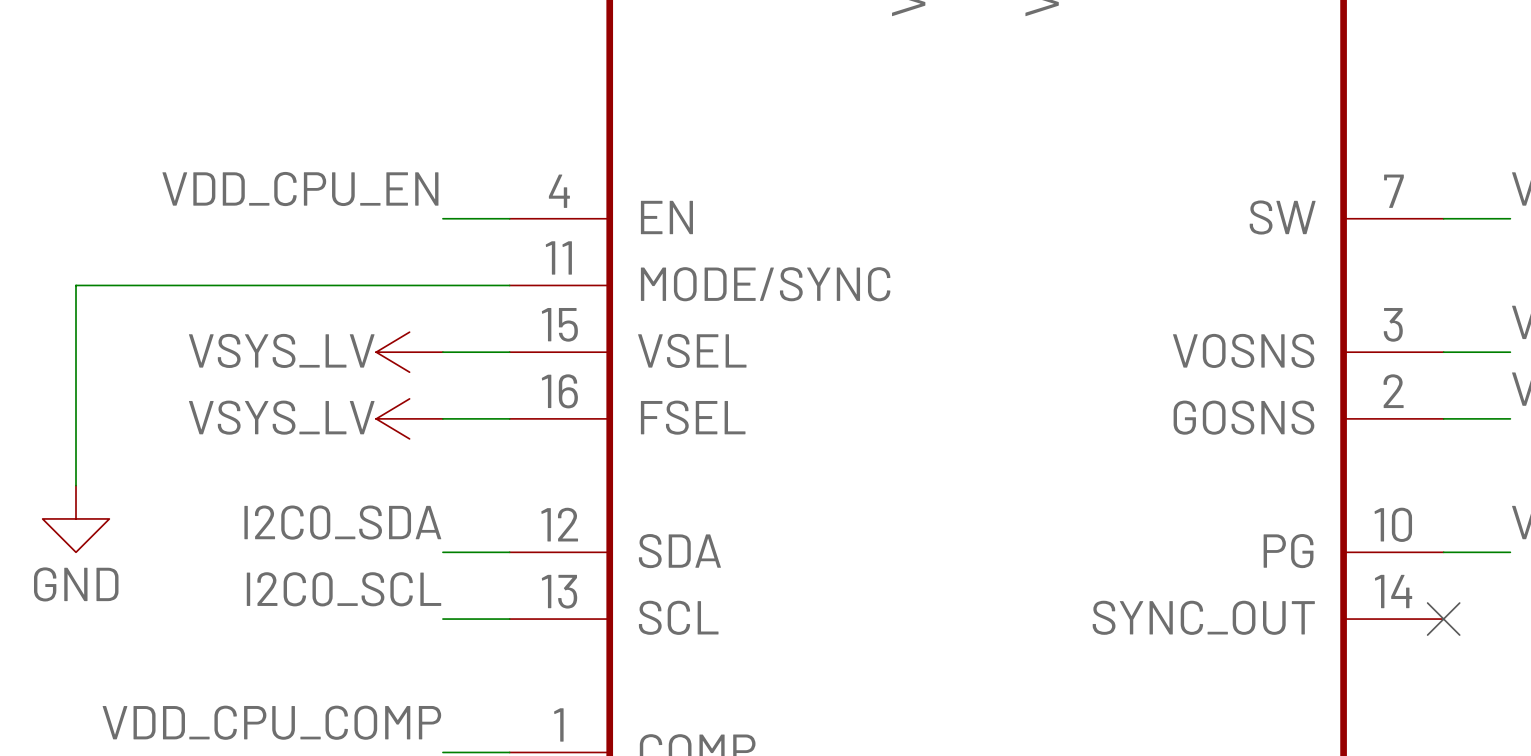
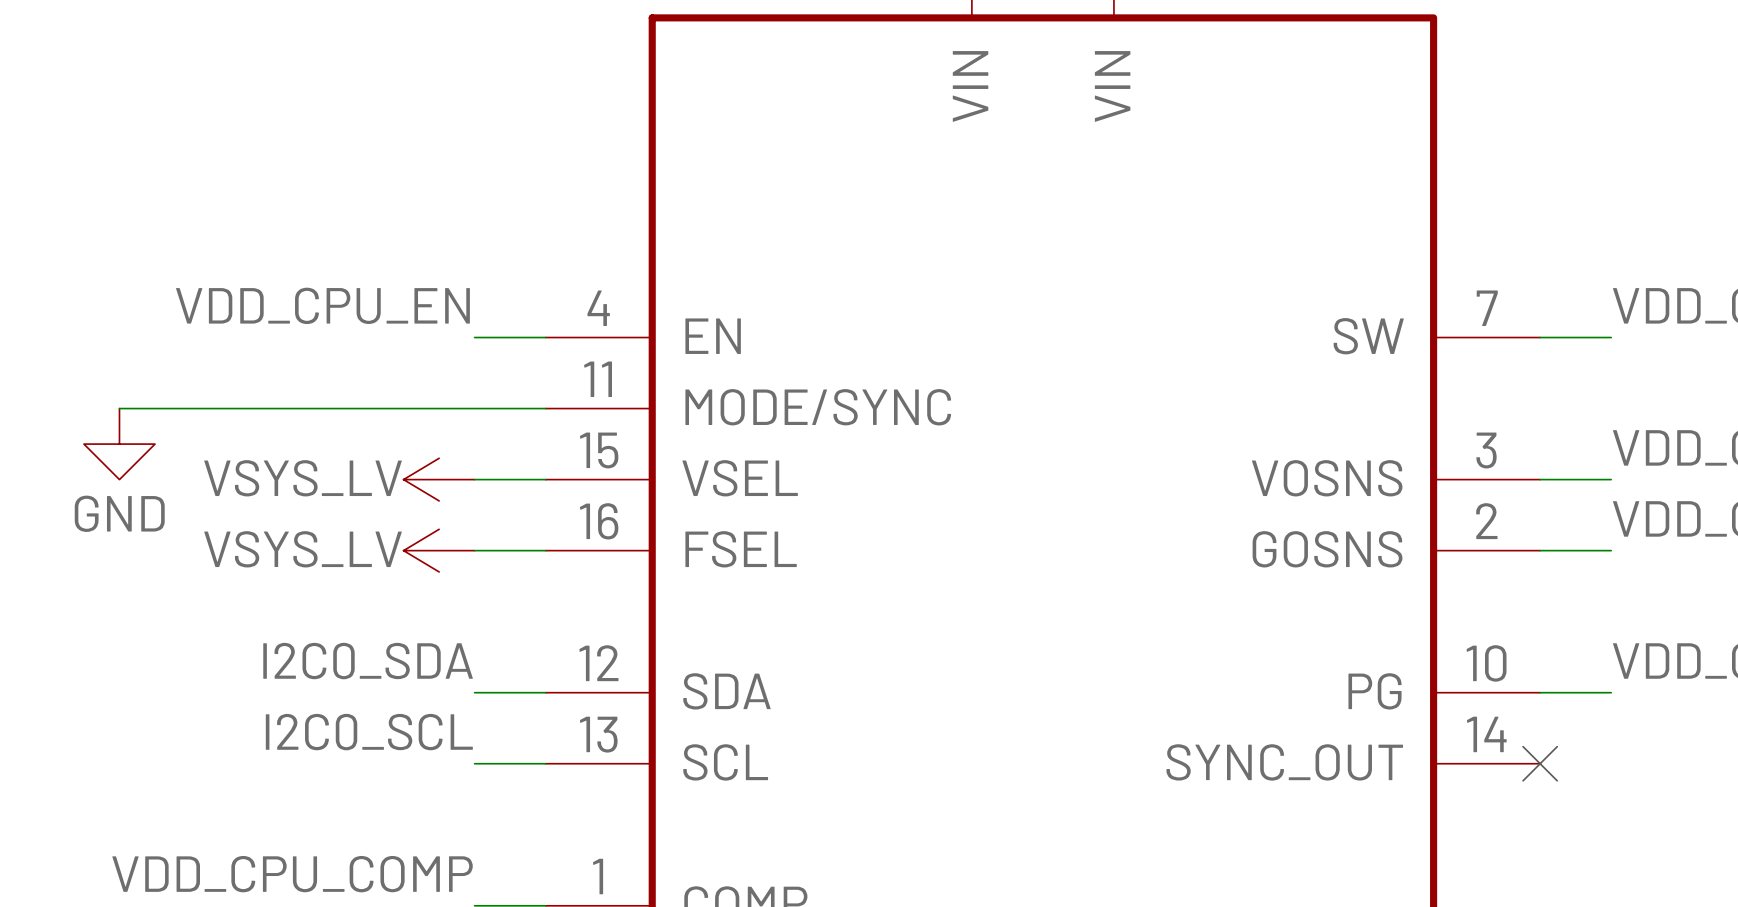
wire: (109, 285) (76, 285) (76, 485) -> none
power symbol position: GND (76, 518) -> GND (119, 444)

